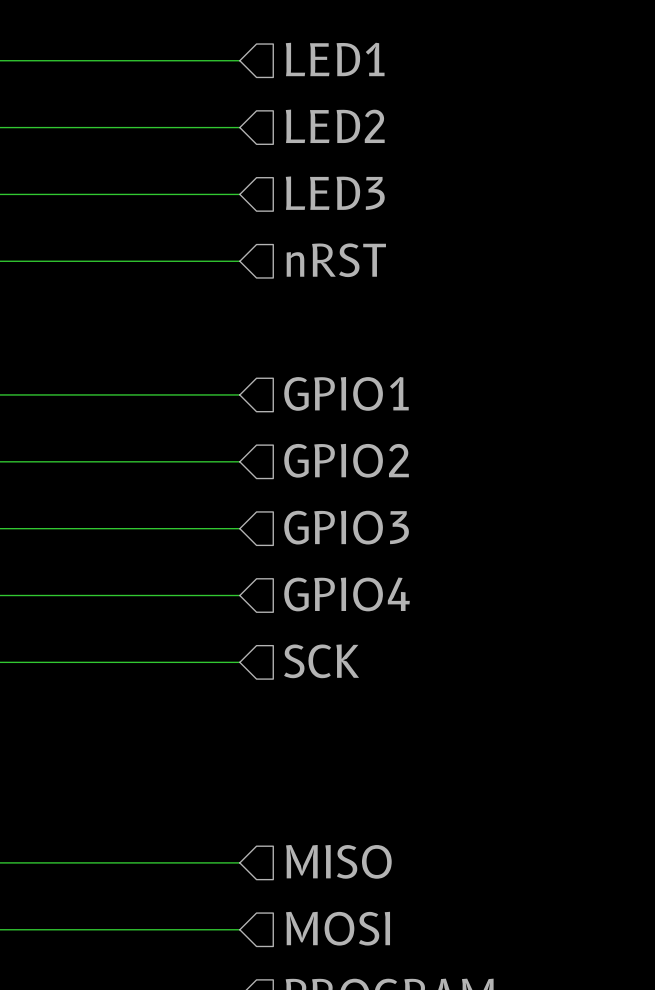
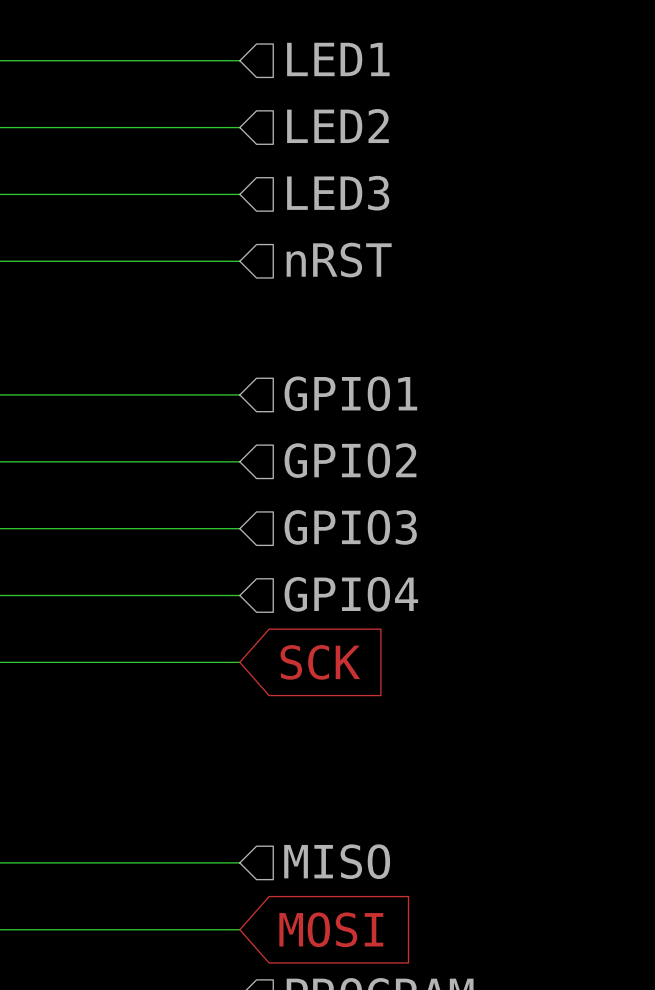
hierarchical label: SCK (321, 661) -> none
global label: none -> SCK (320, 662)
hierarchical label: MOSI (338, 928) -> none
global label: none -> MOSI (331, 929)

